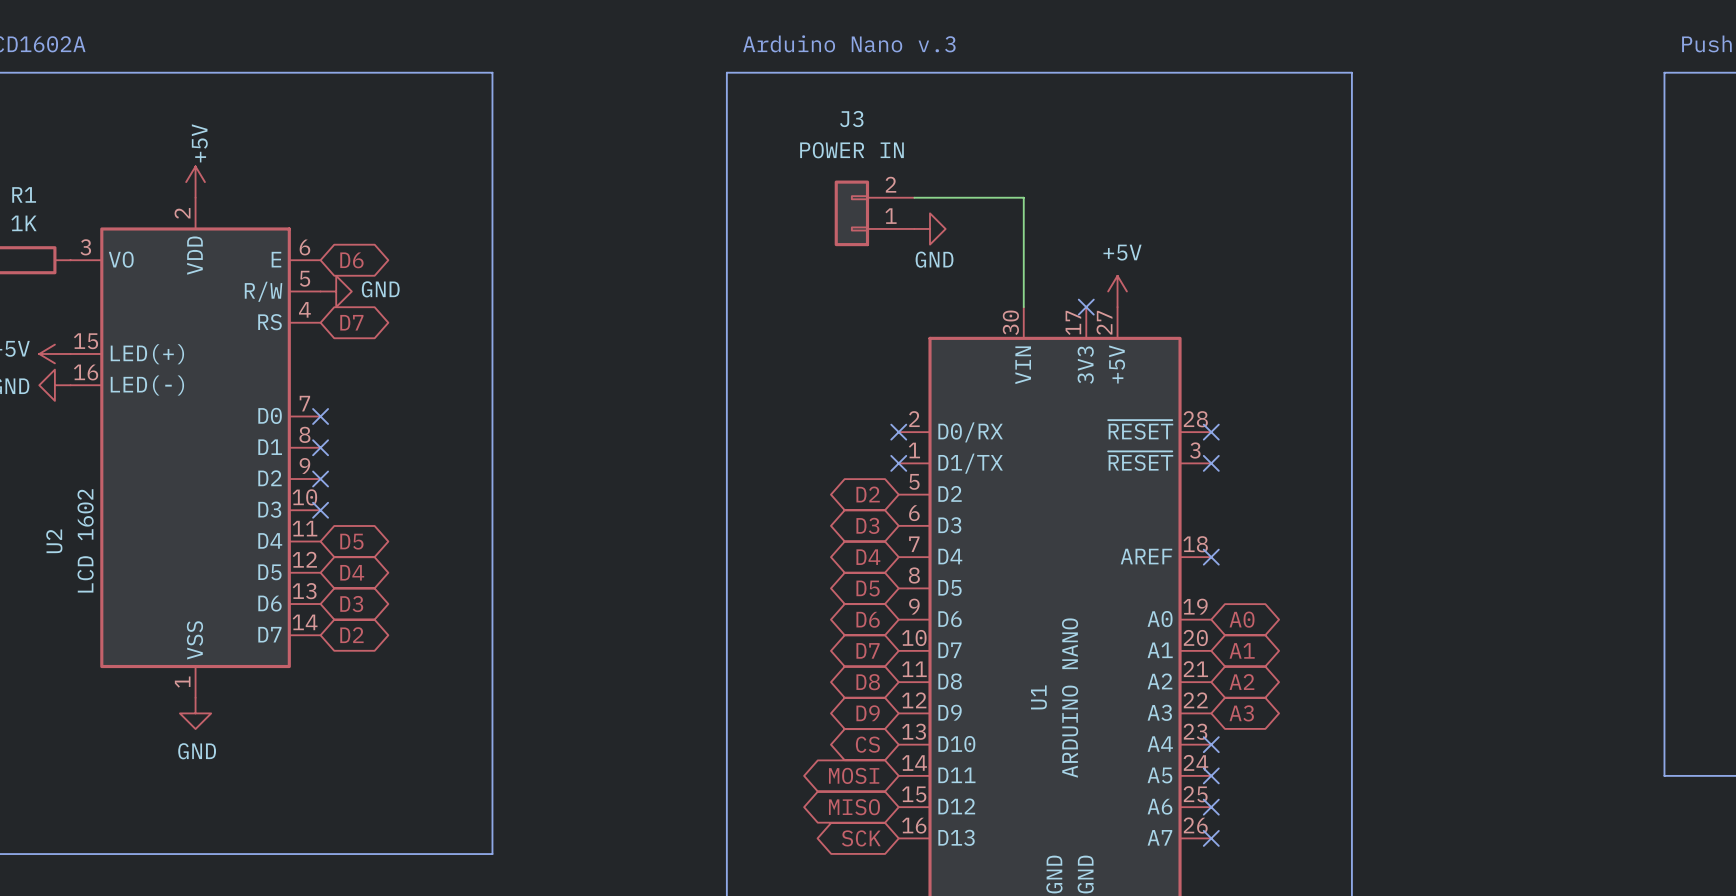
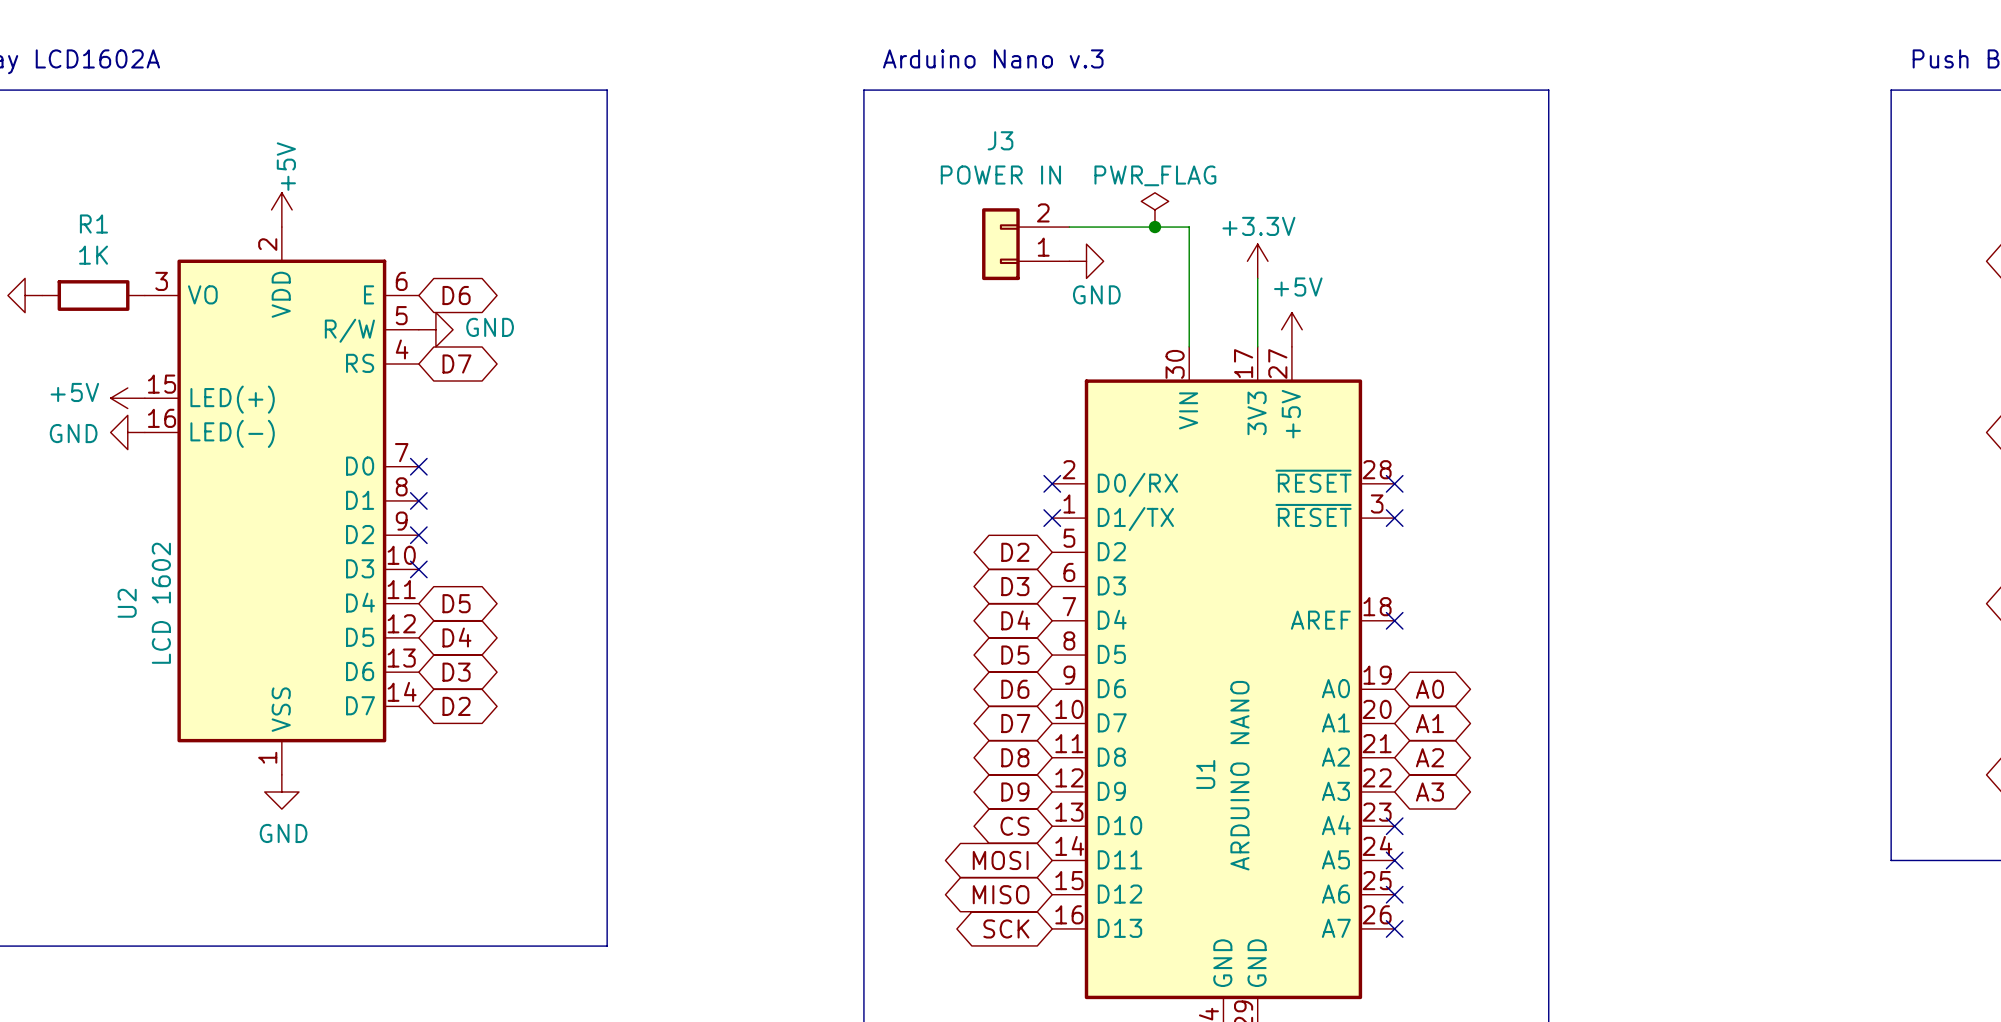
power symbol: none -> PWR_FLAG (1154, 209)
junction: none -> (1154, 227)
power symbol: none -> +3.3V (1257, 261)
wire: none -> (1257, 278) (1257, 346)
no-connect mark: (1086, 307) -> none

